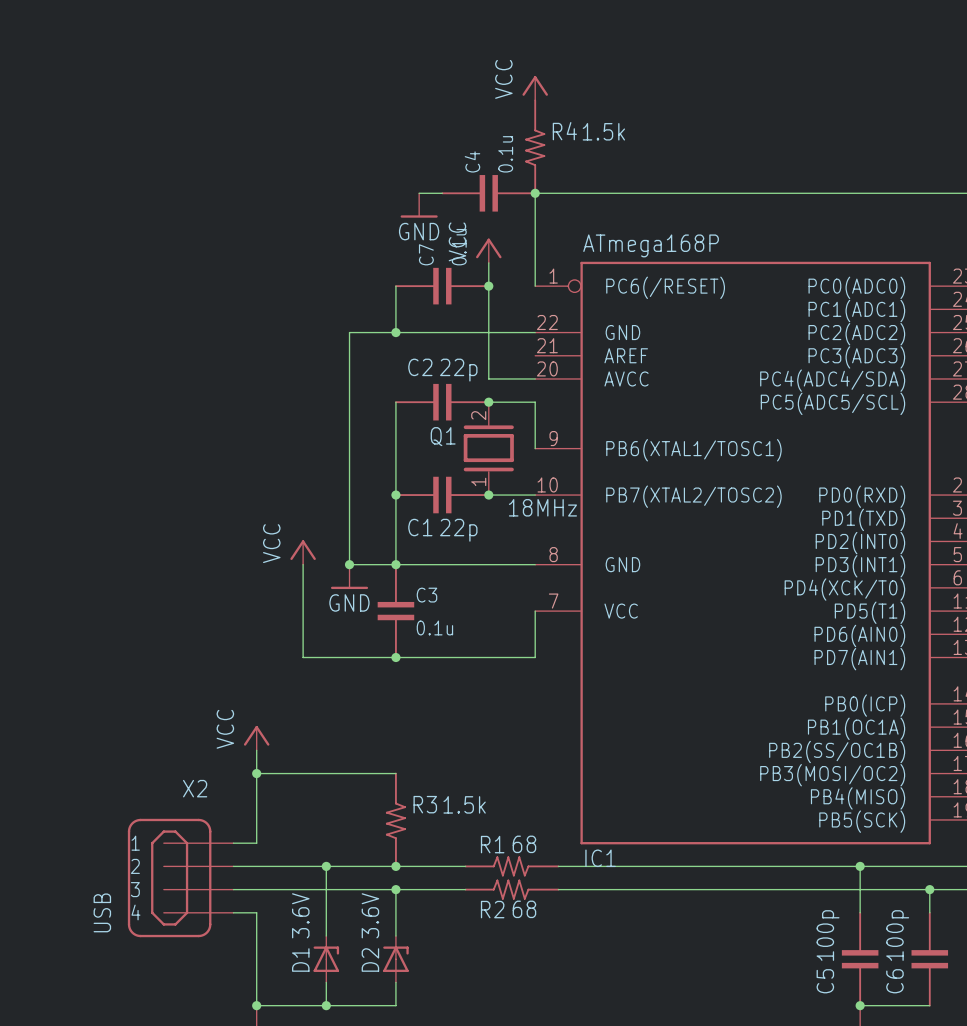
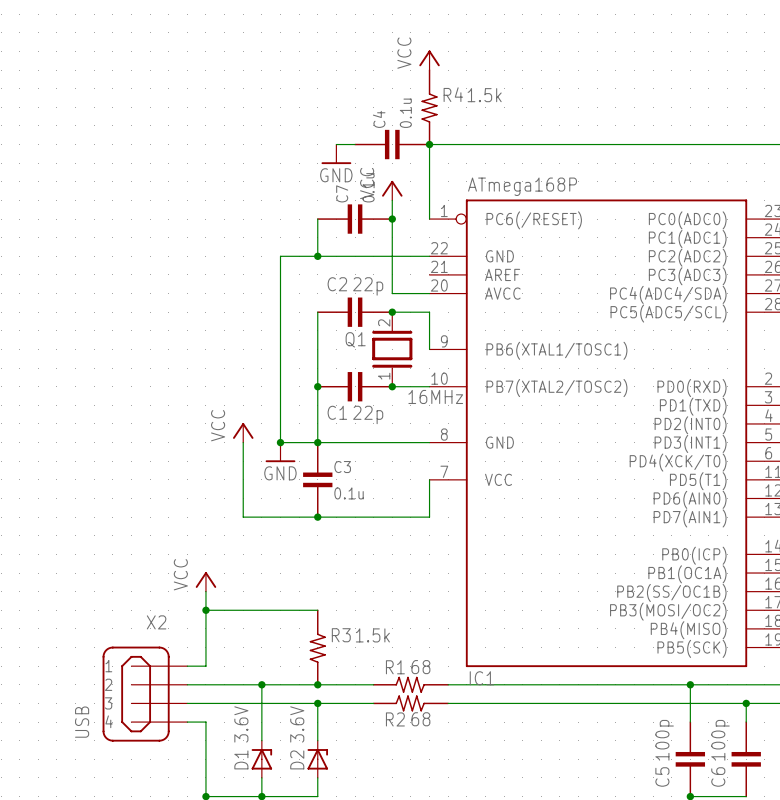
Q1 value: 18MHz (542, 507) -> 16MHz (435, 396)

